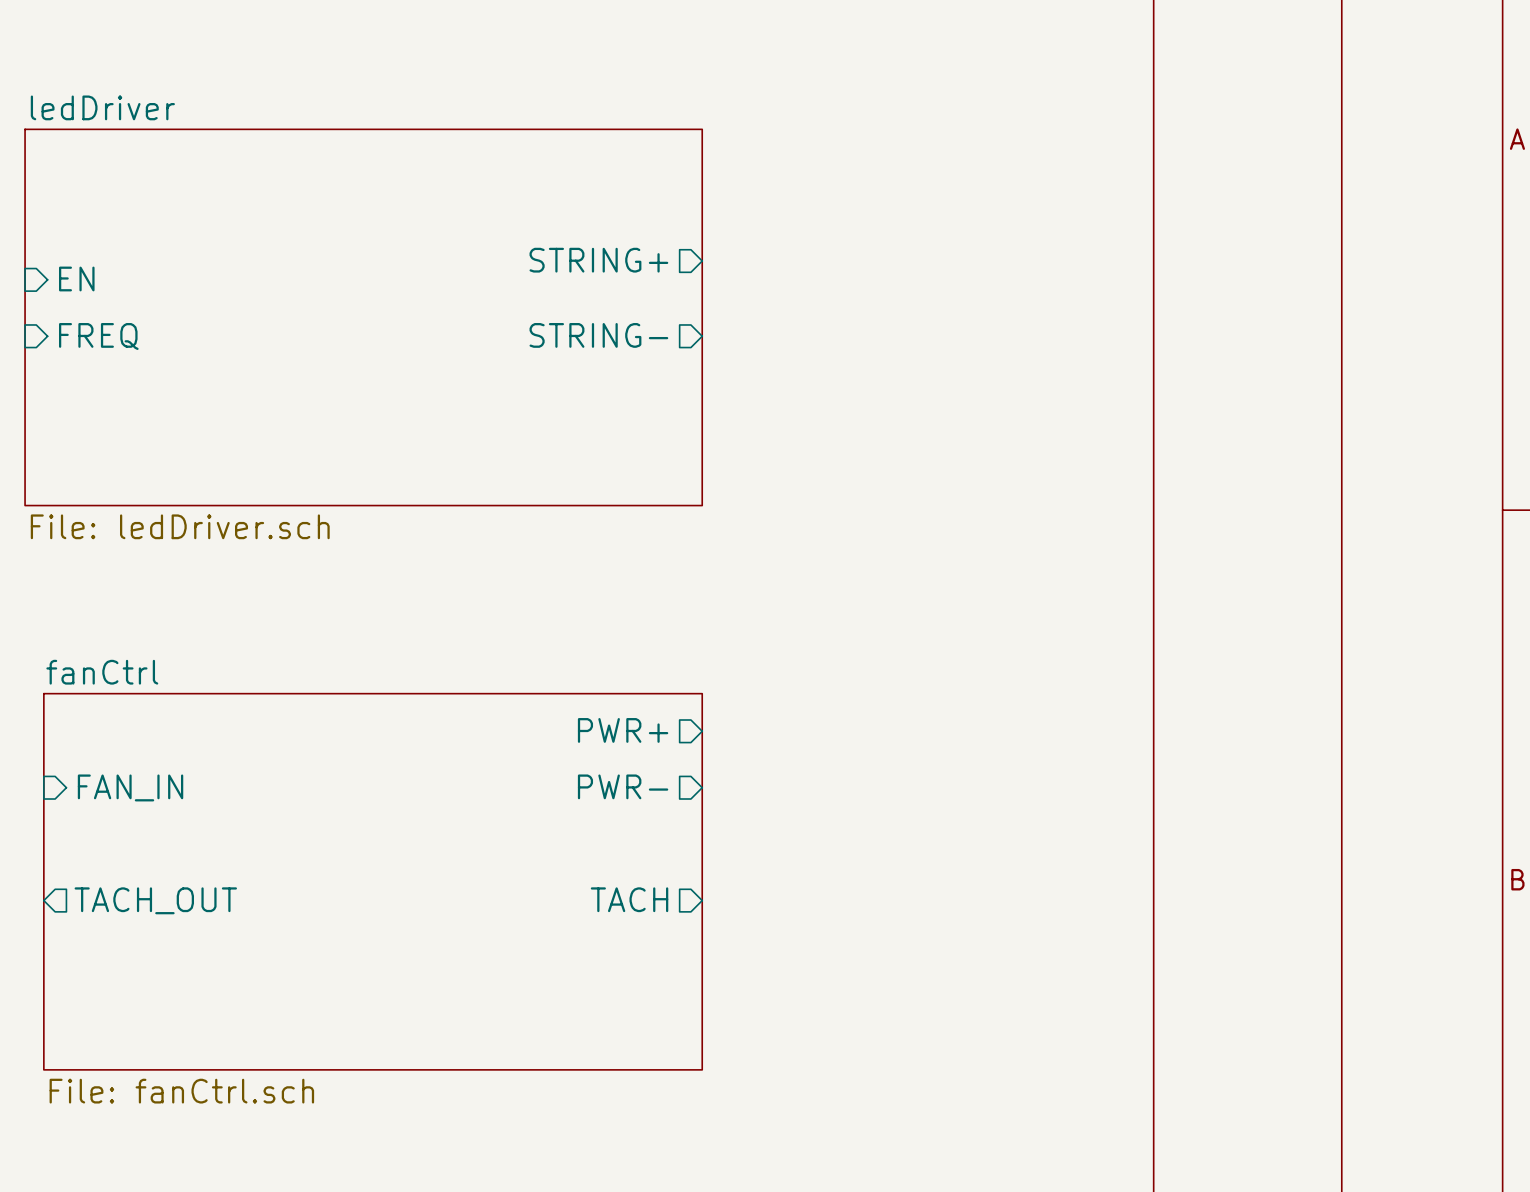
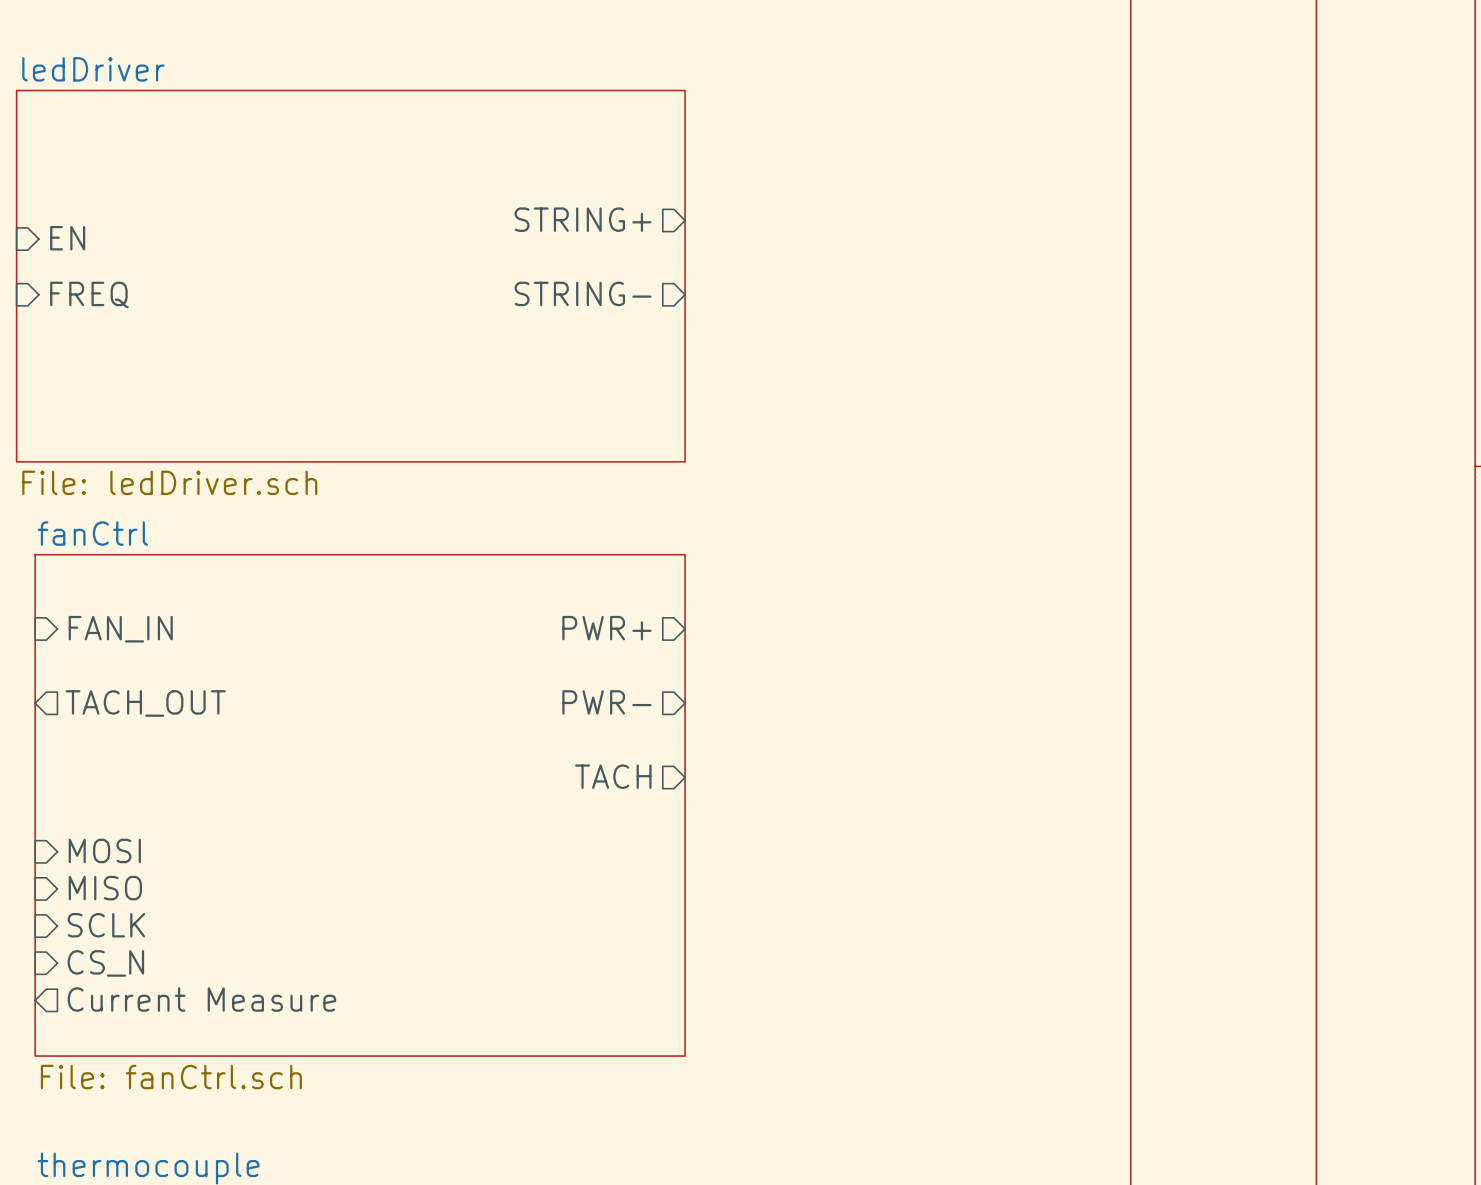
sheet pin position: PWR+ (623, 730) -> PWR+ (606, 628)
sheet pin: none -> TACH_OUT (145, 703)
sheet pin position: PWR- (623, 786) -> PWR- (606, 702)
sheet pin position: FAN_IN (130, 787) -> FAN_IN (120, 629)
sheet fanCtrl: none -> File: fanCtrl.sch (360, 805)
sheet fanCtrl: File: fanCtrl.sch (373, 881) -> none
sheet pin position: TACH (629, 899) -> TACH (613, 776)
sheet pin shape: output (155, 900) -> input (104, 850)
sheet pin: TACH_OUT (155, 900) -> MOSI (104, 850)
sheet pin: none -> MISO (105, 888)
sheet pin: none -> SCLK (106, 925)
sheet pin: none -> CS_N (105, 963)
sheet pin: none -> Current Measure (201, 999)

